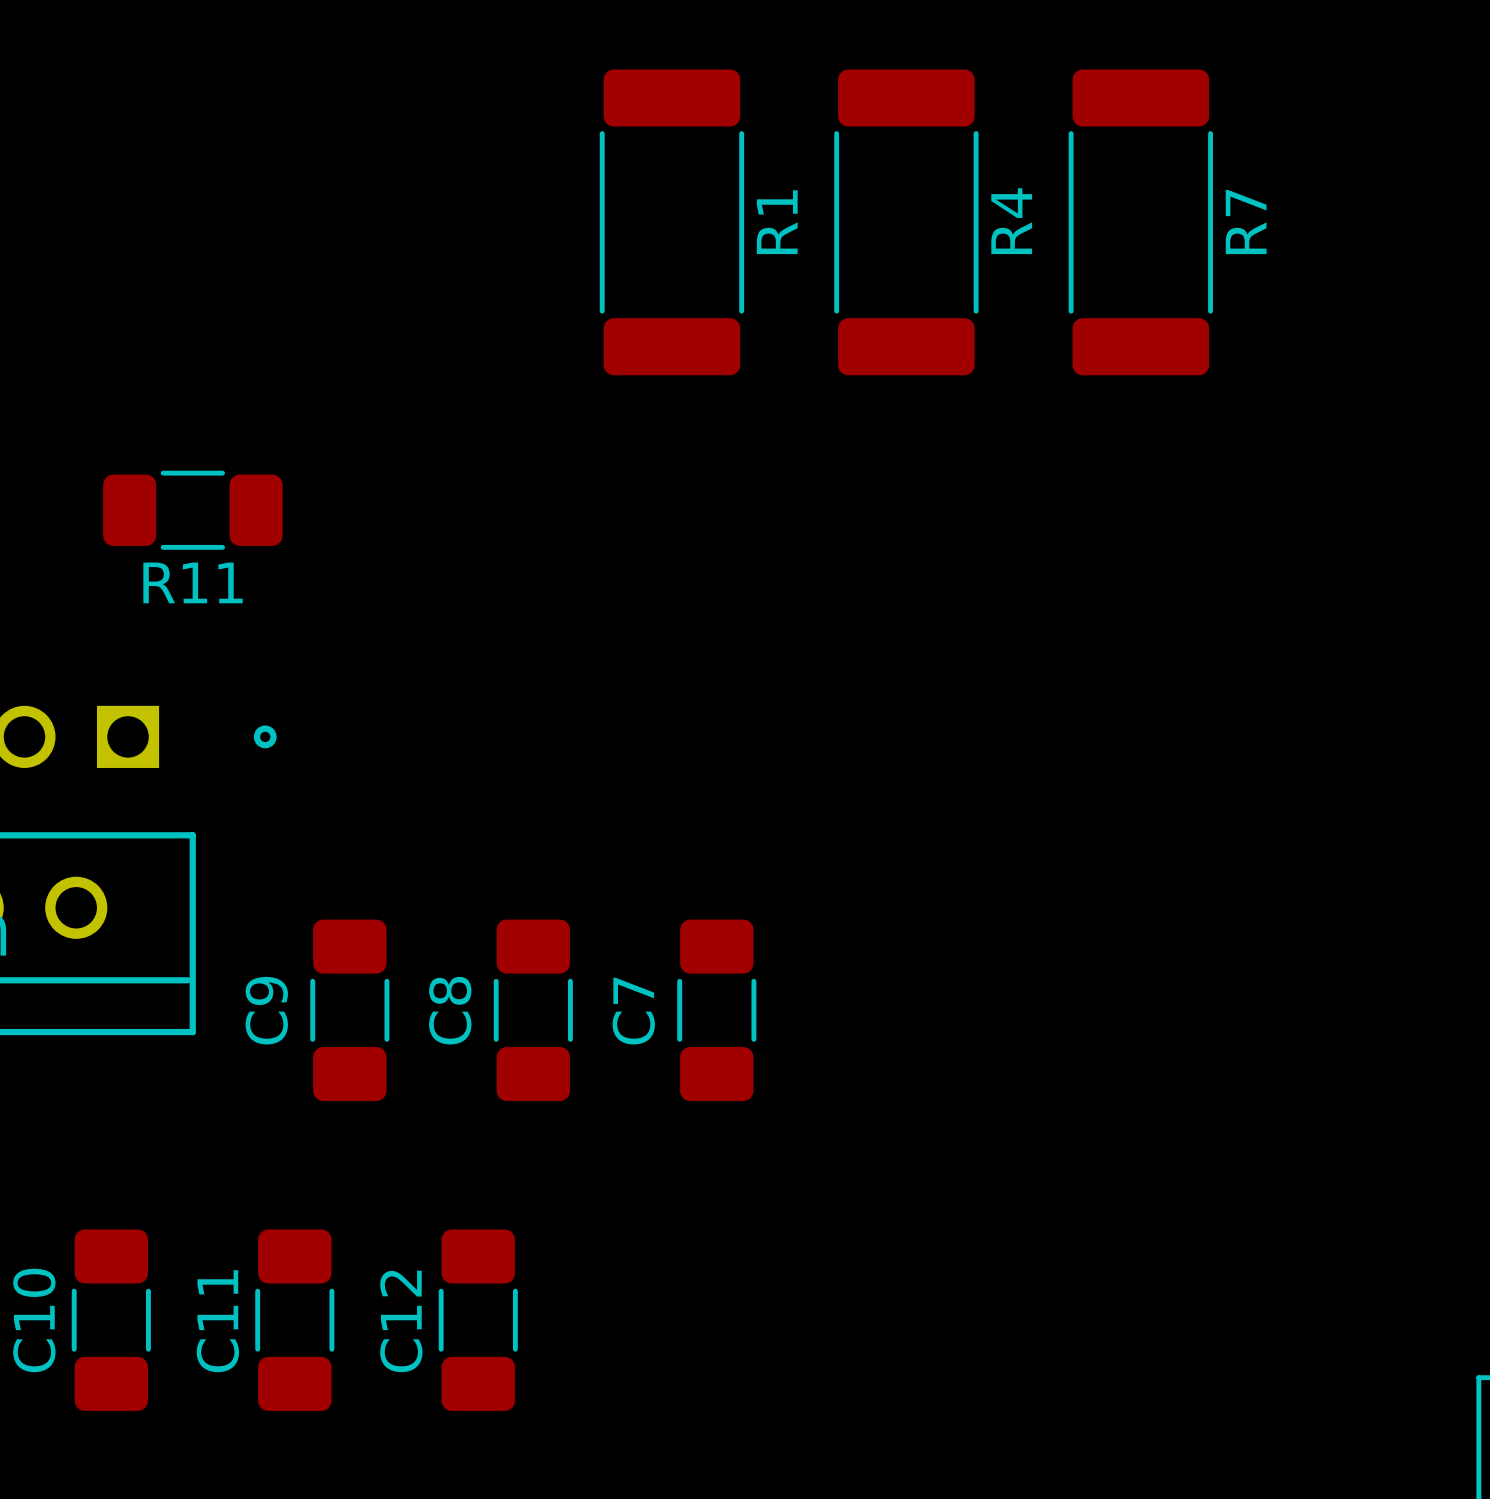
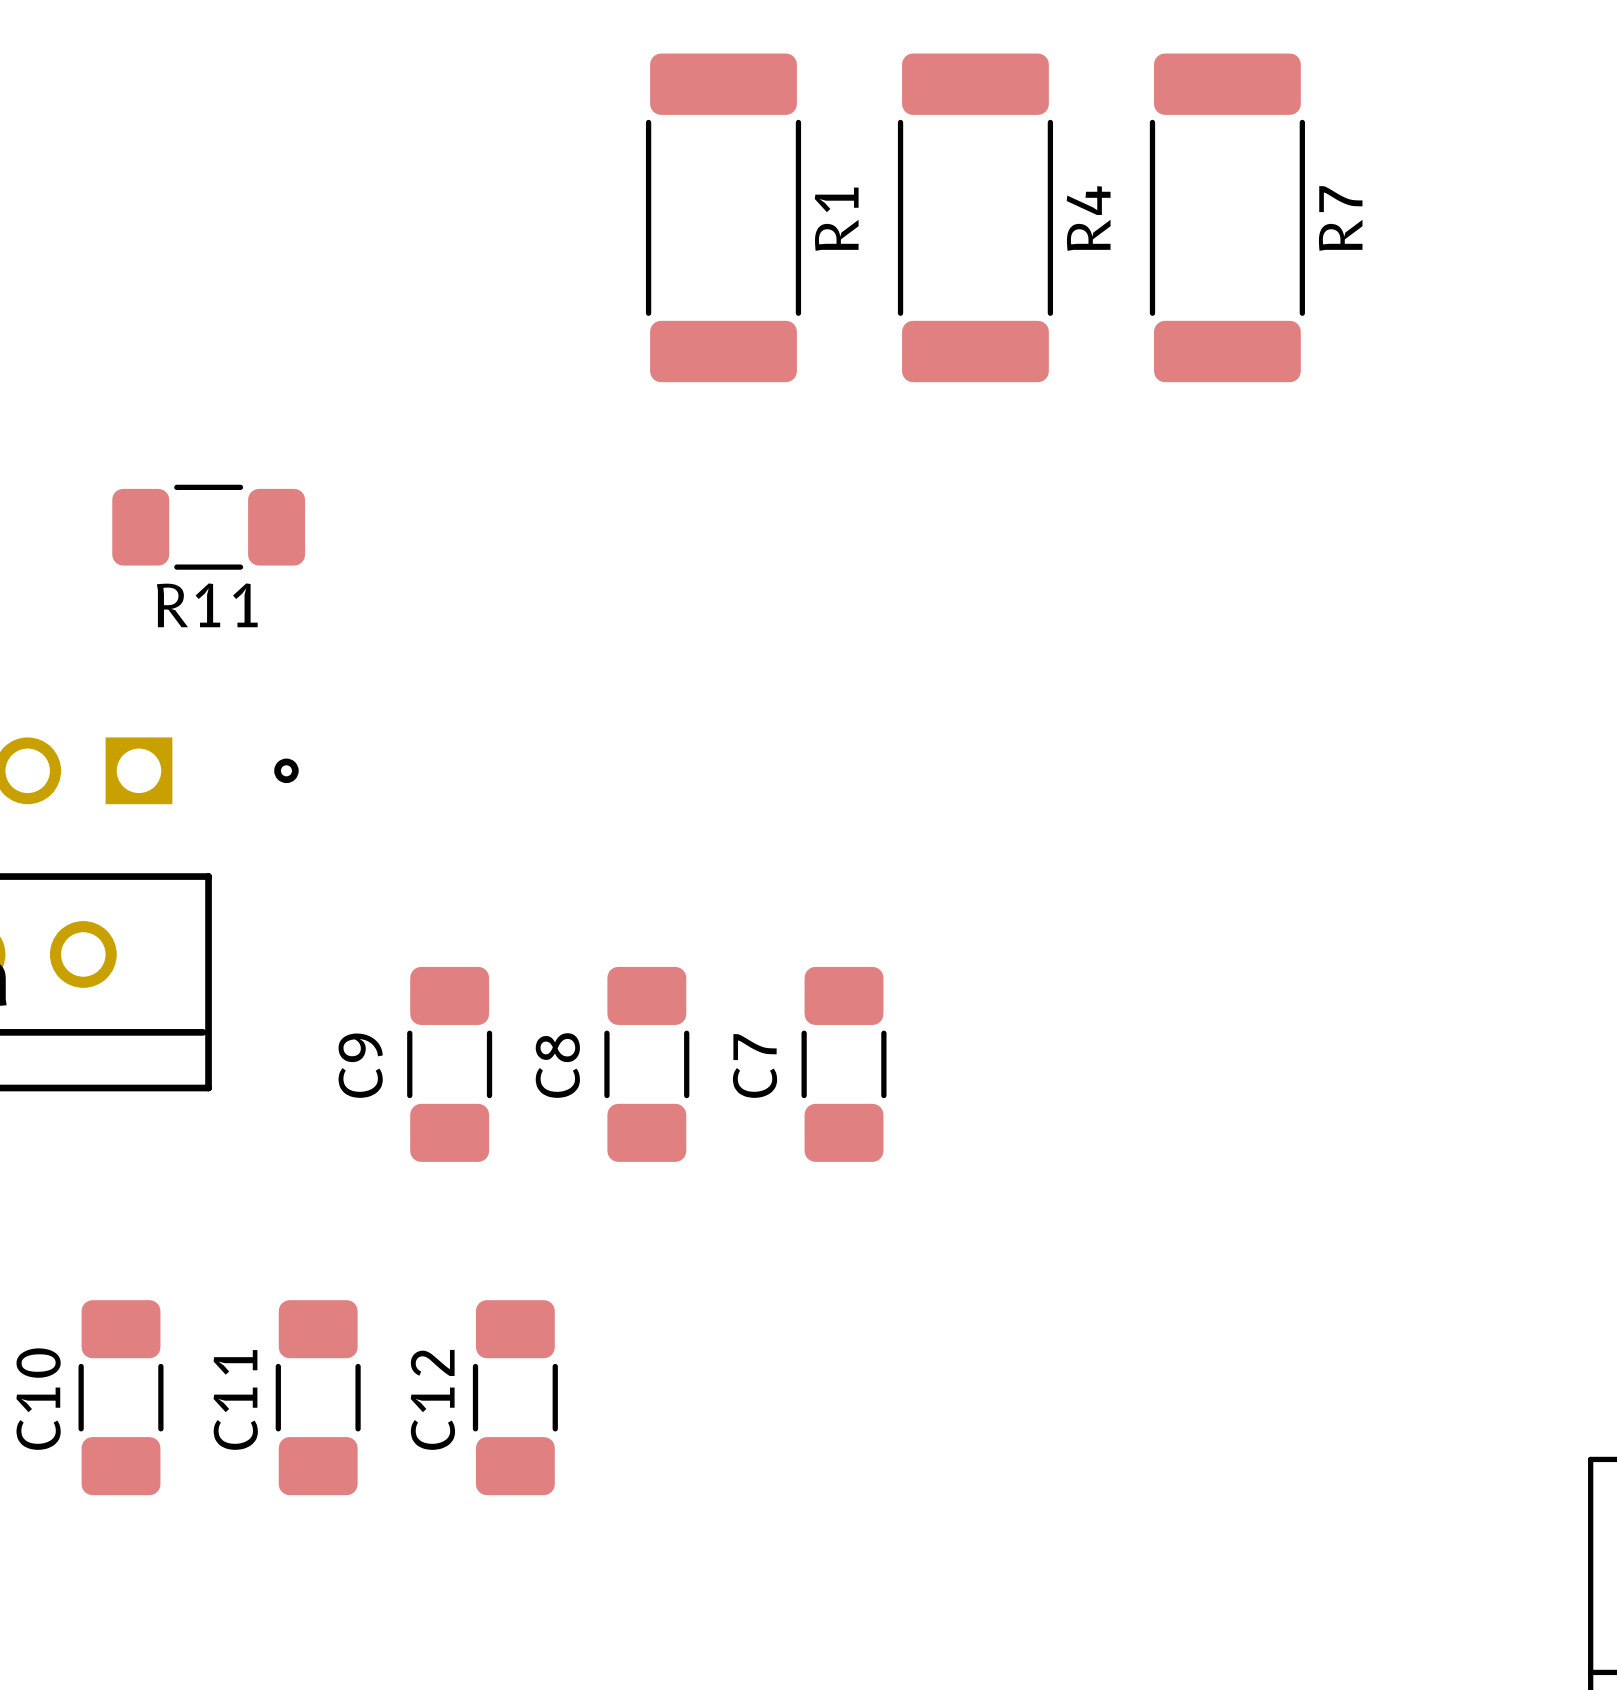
C9 position: (349, 1010) -> (449, 1064)
C8 position: (533, 1010) -> (646, 1064)
C7 position: (716, 1010) -> (844, 1064)

